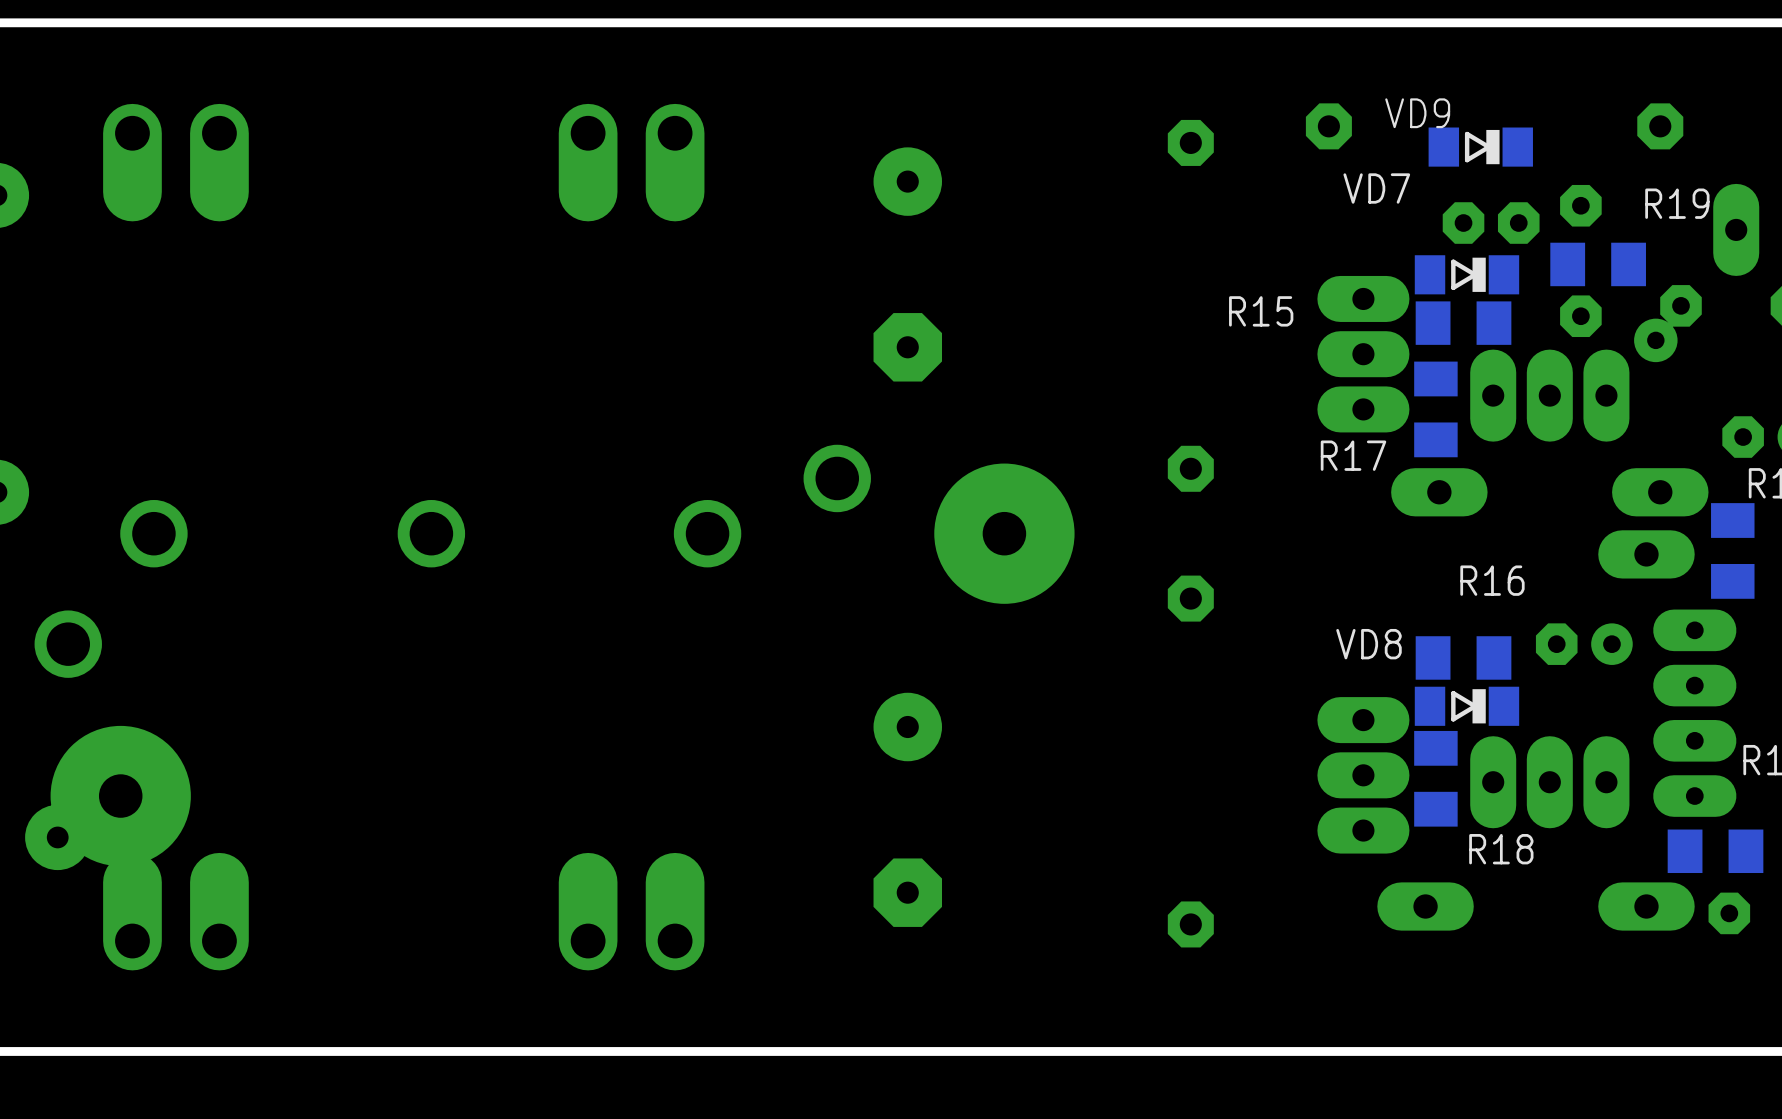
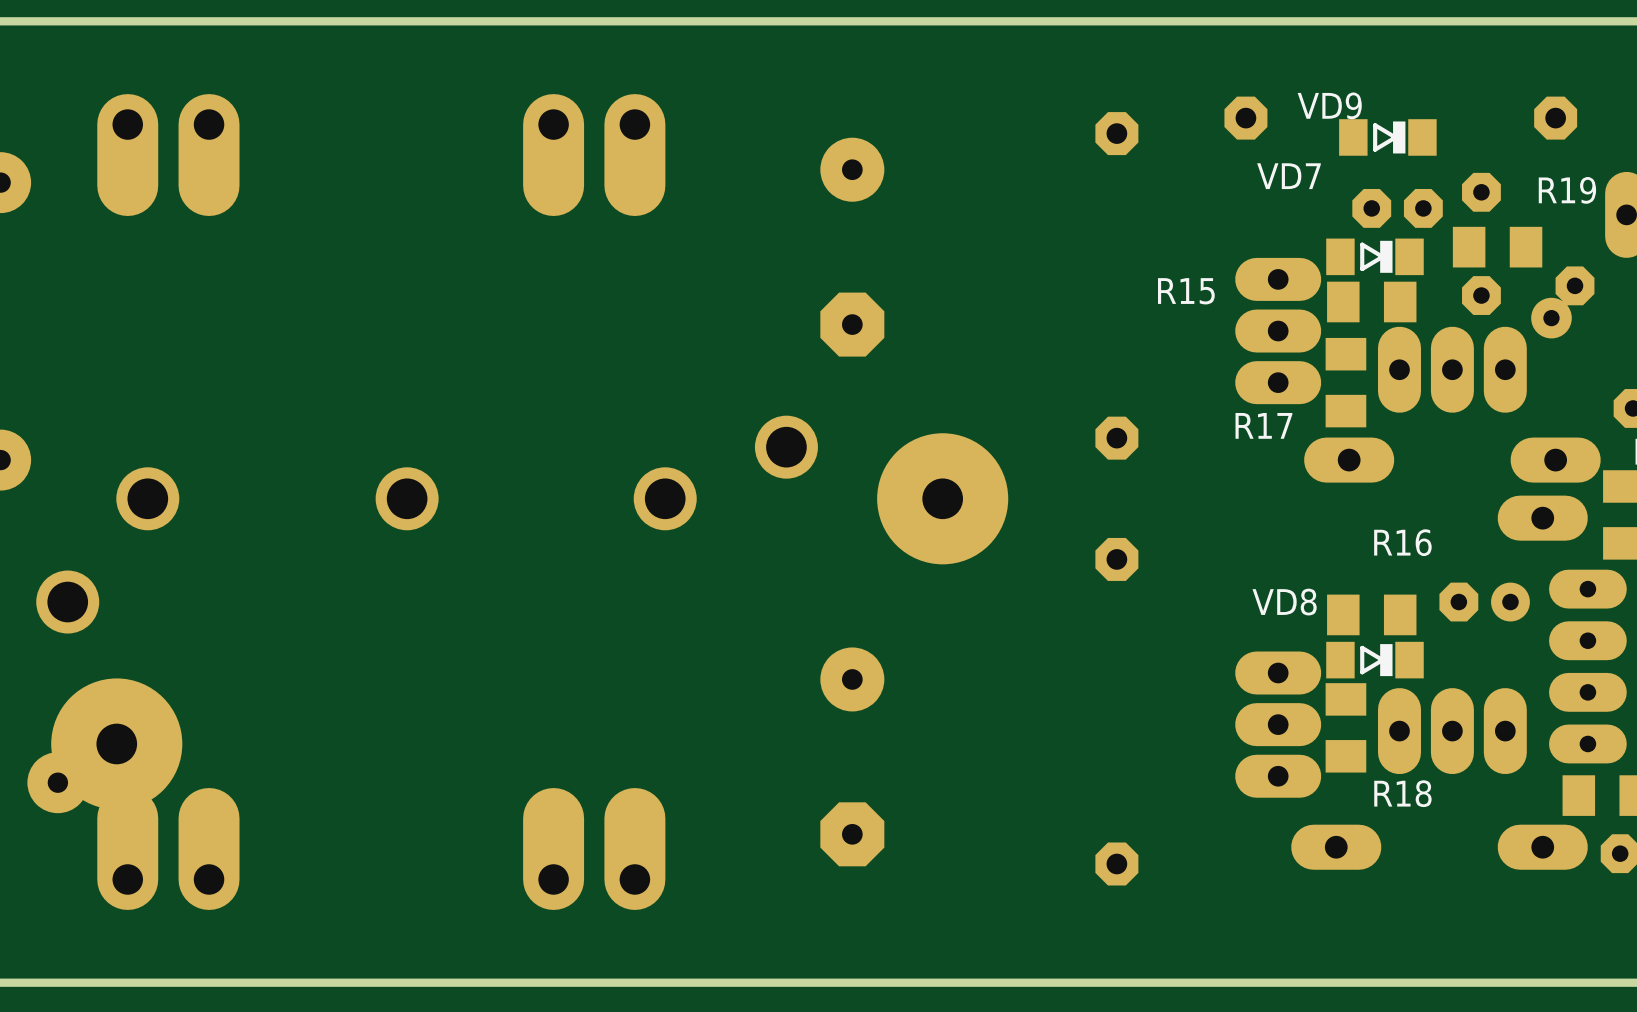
part footprint: [103, 103, 249, 222] -> [97, 94, 240, 217]
part footprint: [558, 103, 705, 222] -> [523, 94, 666, 217]
part footprint: [103, 852, 249, 971] -> [97, 788, 240, 910]
part footprint: [558, 852, 705, 971] -> [523, 788, 666, 910]

